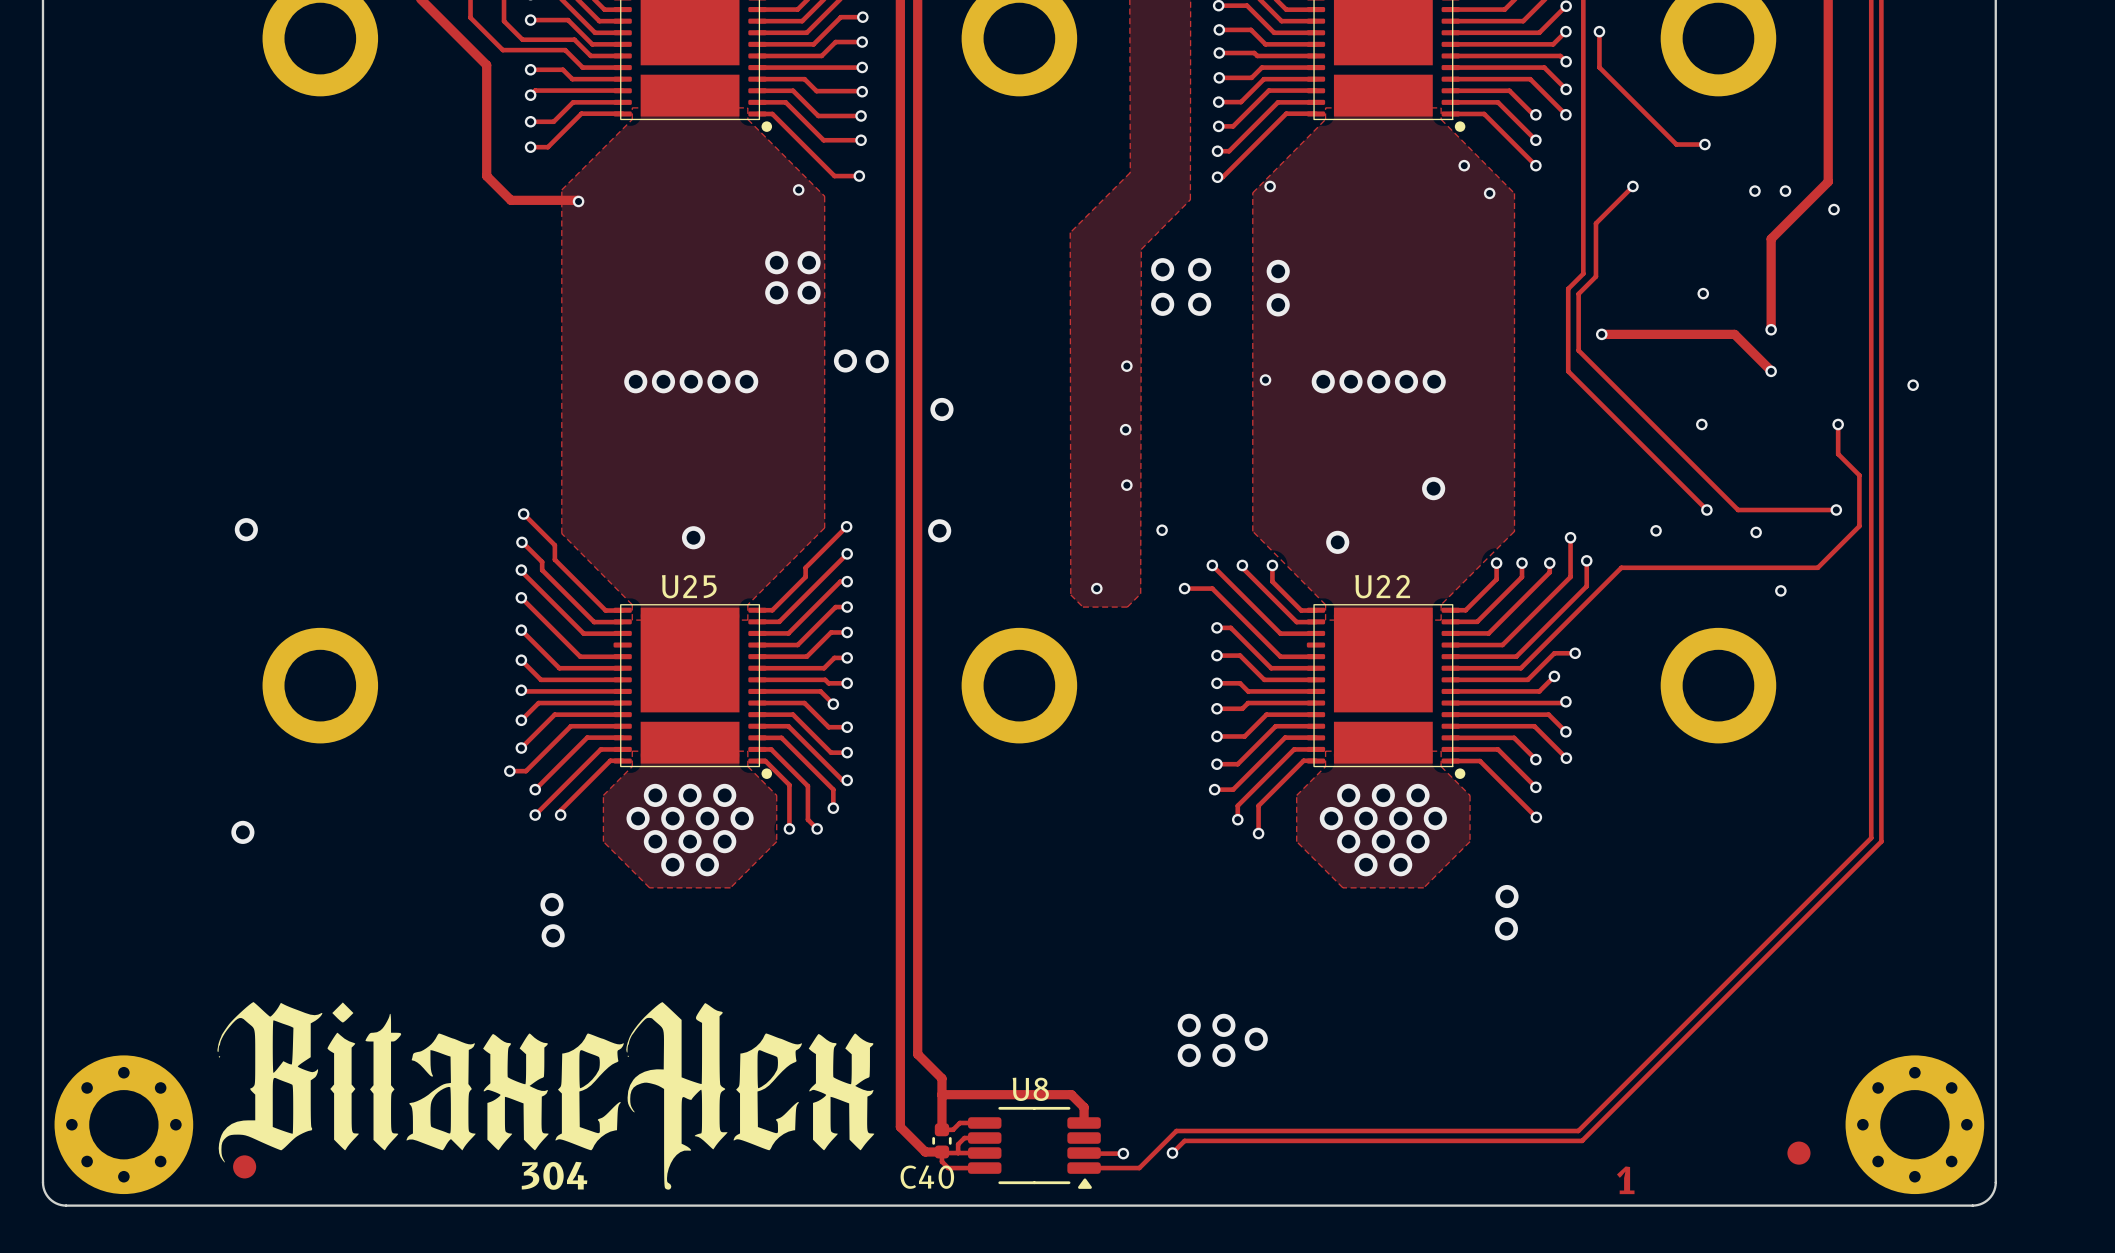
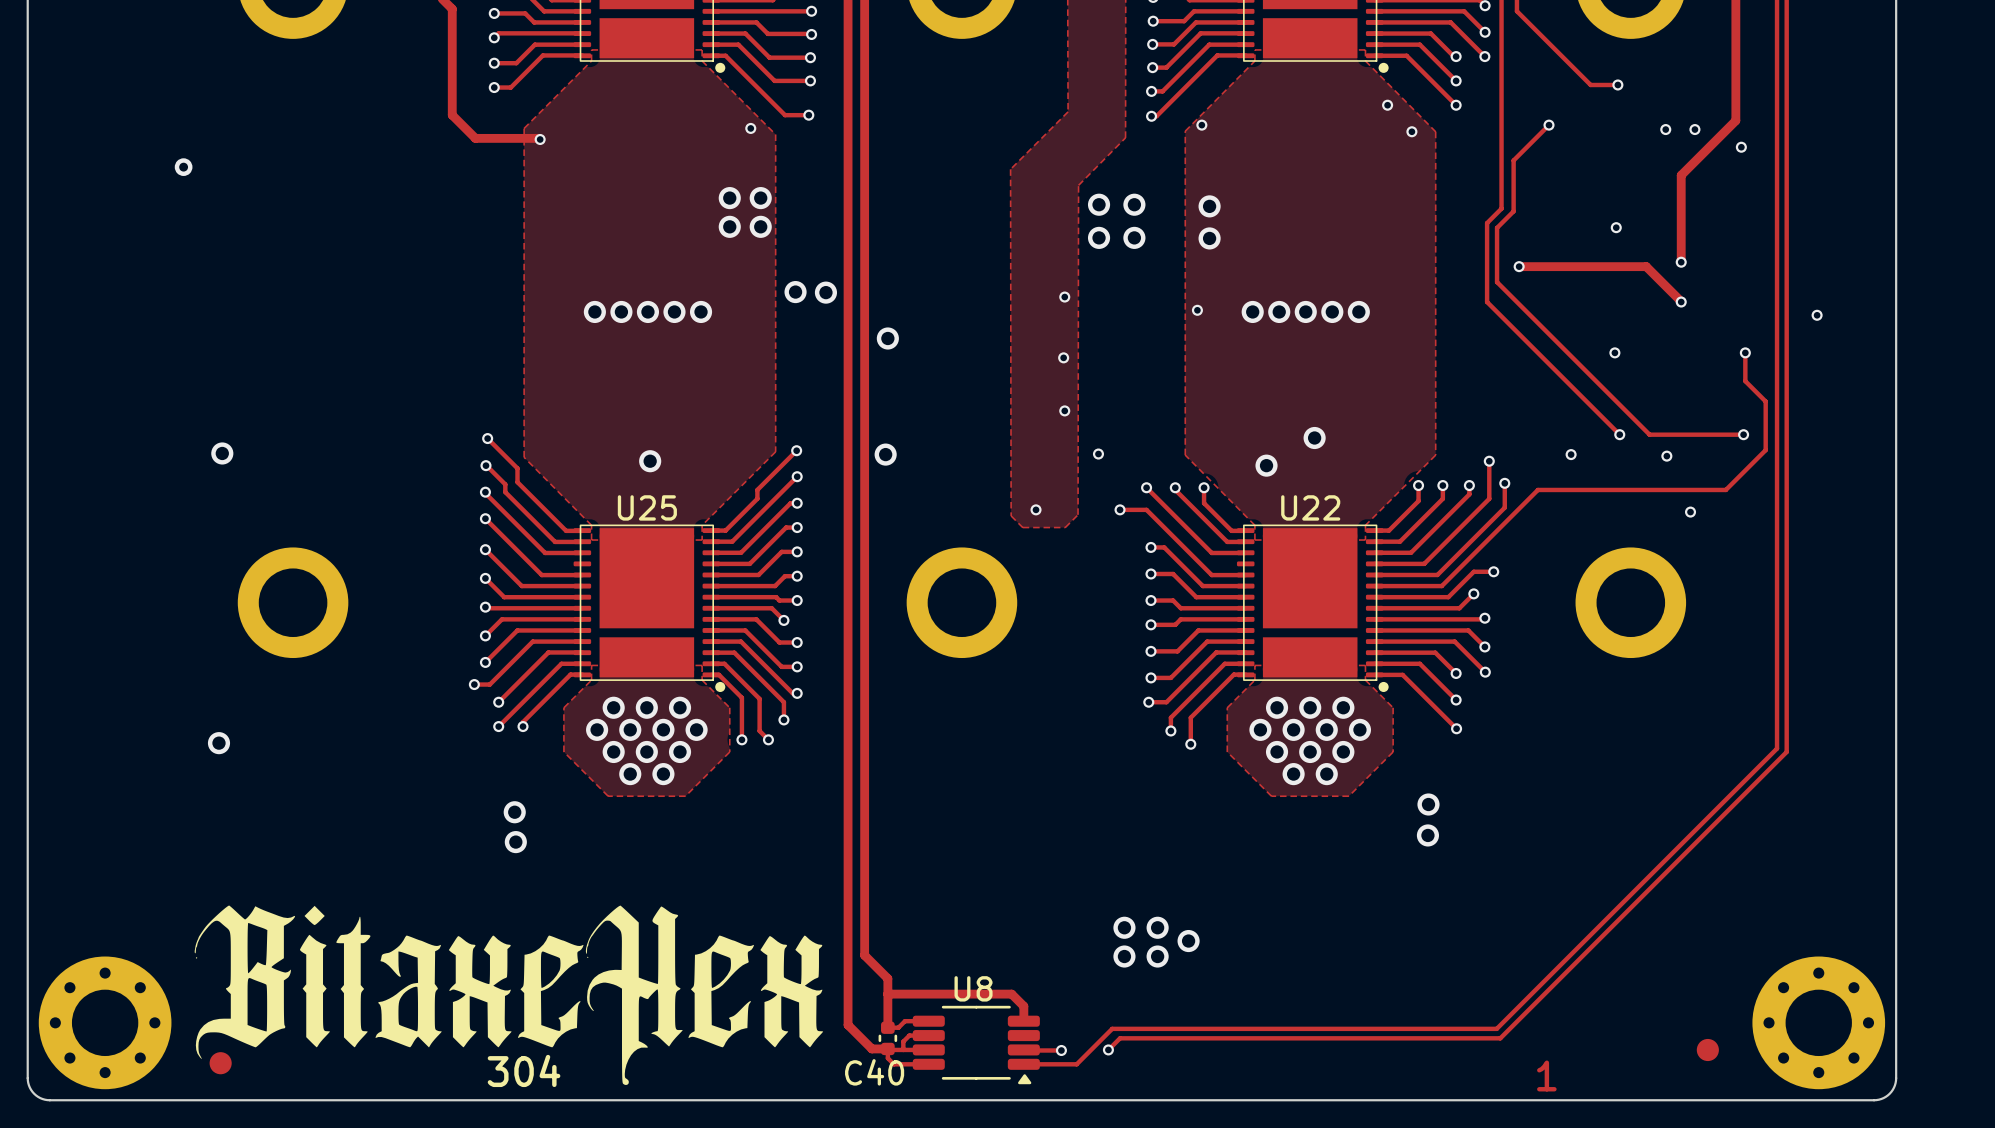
via: none -> (183, 167)
via position: (1433, 488) -> (1314, 438)

